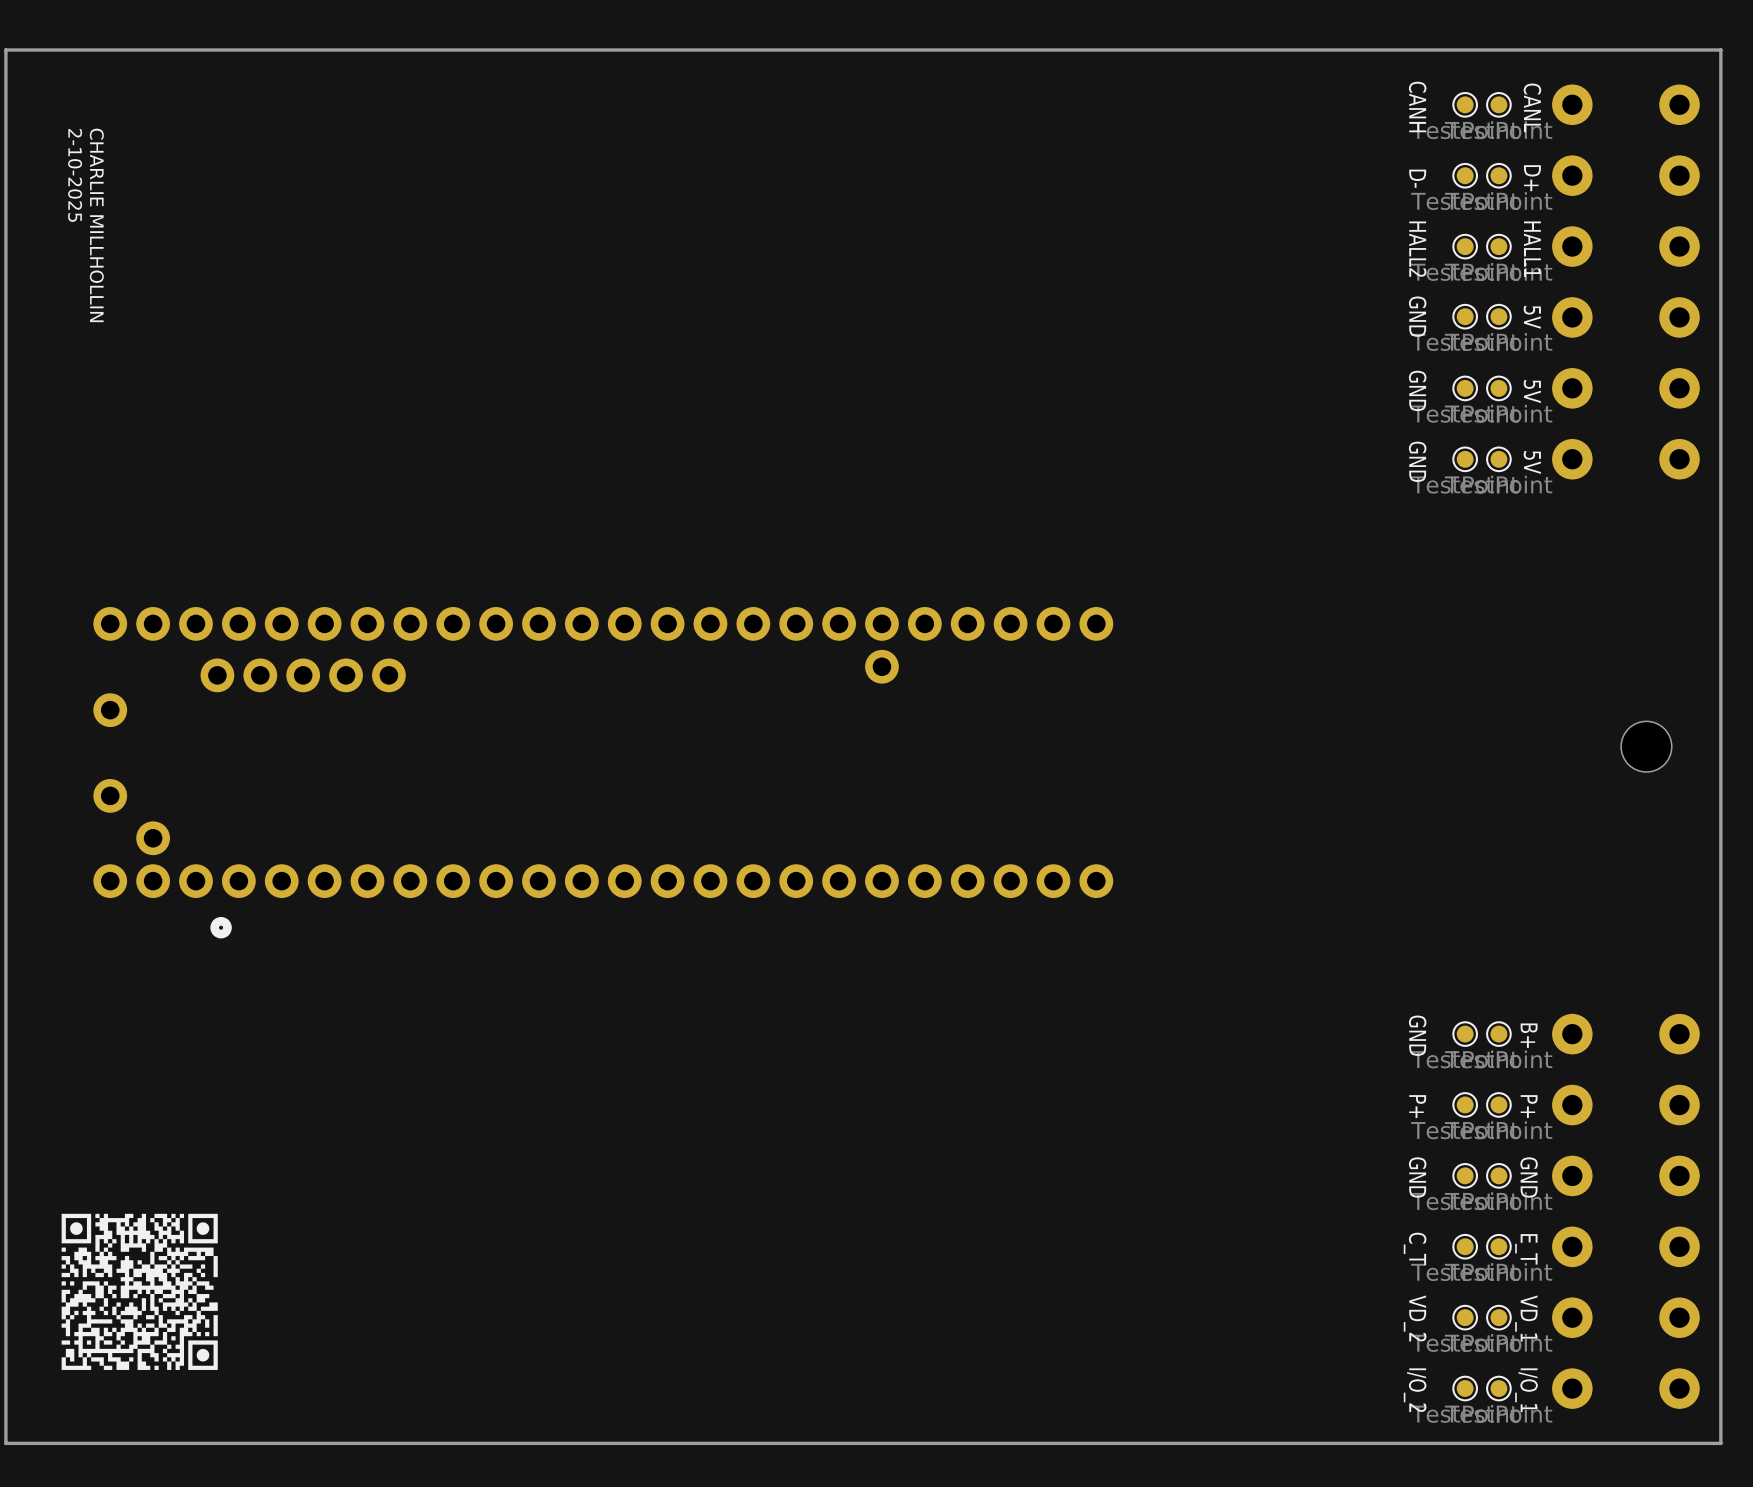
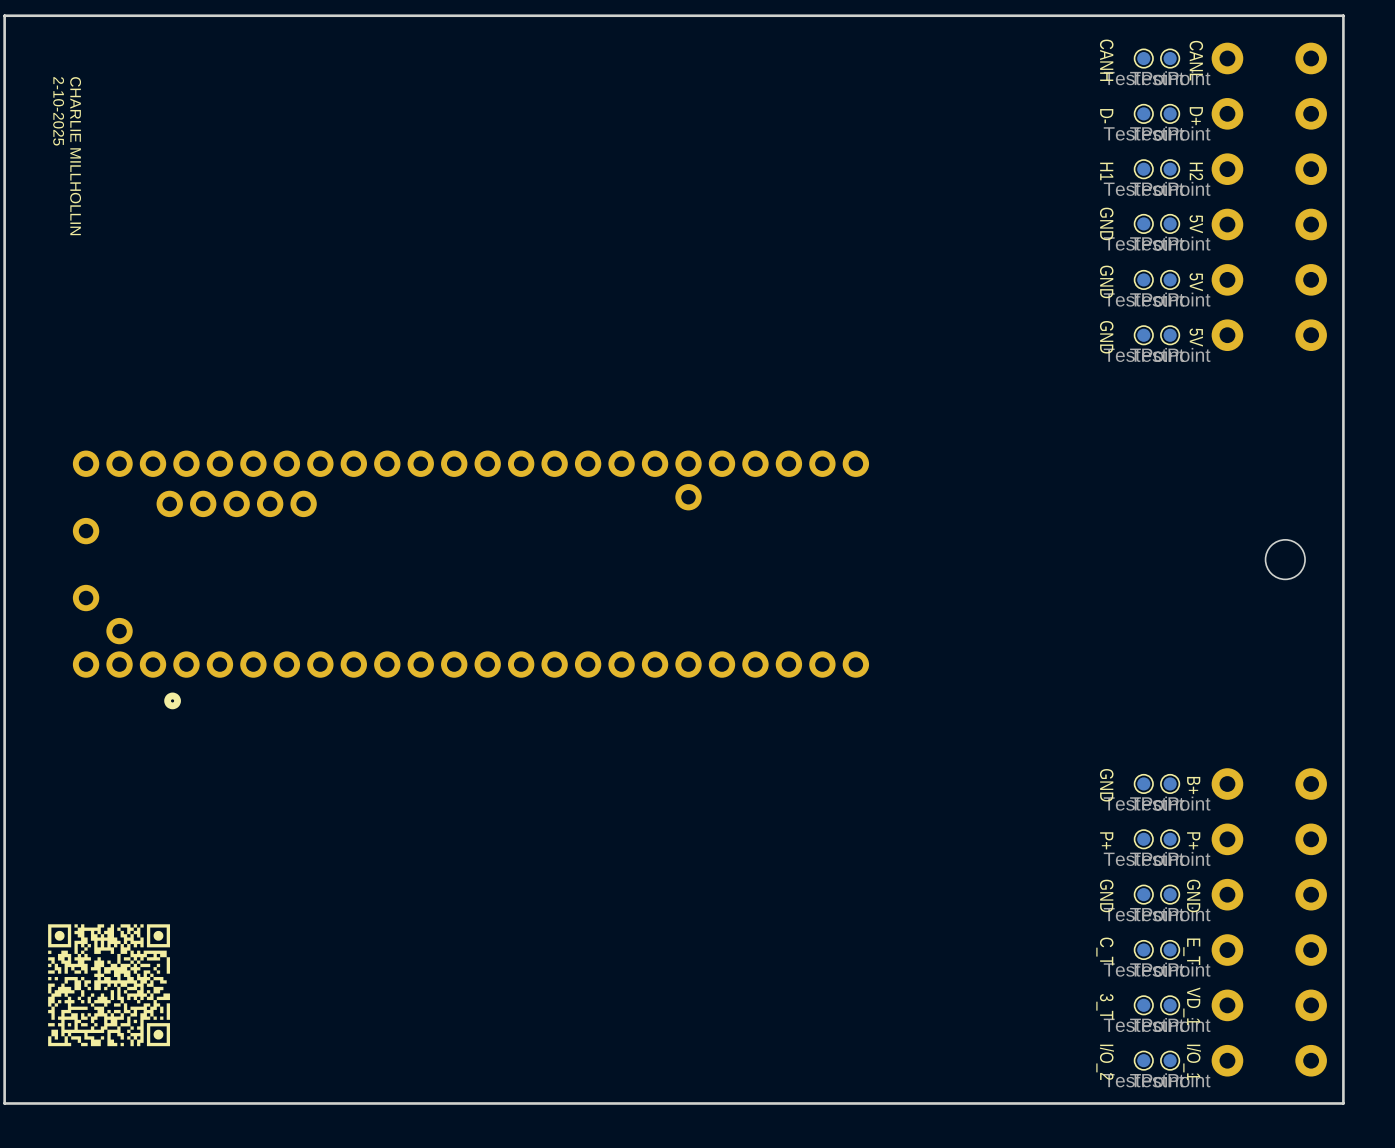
HALL2 name: HALL2 (1417, 249) -> H1 (1106, 171)
HALL1 name: HALL1 (1532, 249) -> H2 (1196, 171)
VD_2 name: VD_2 (1415, 1318) -> 3_T (1104, 1006)

